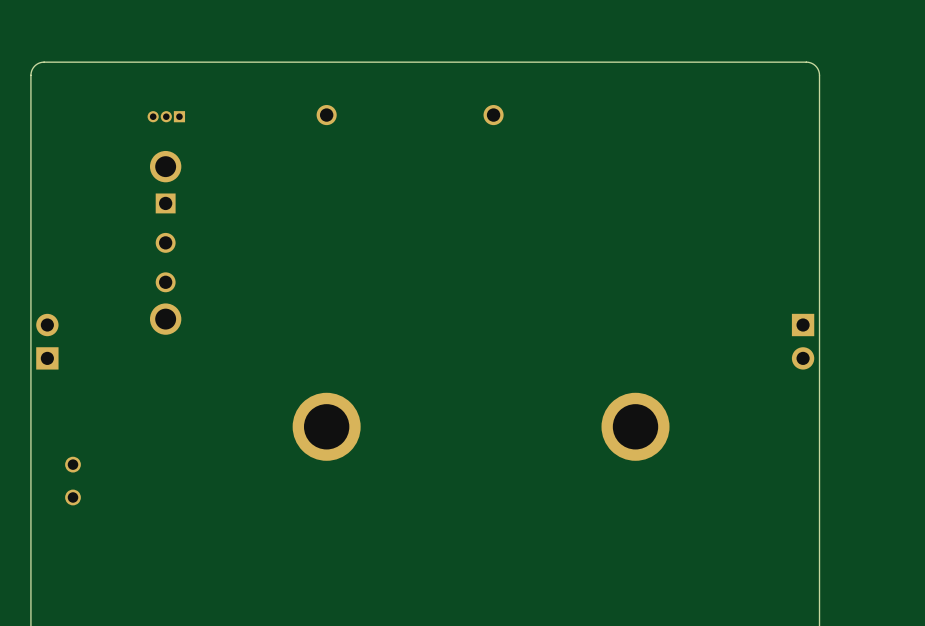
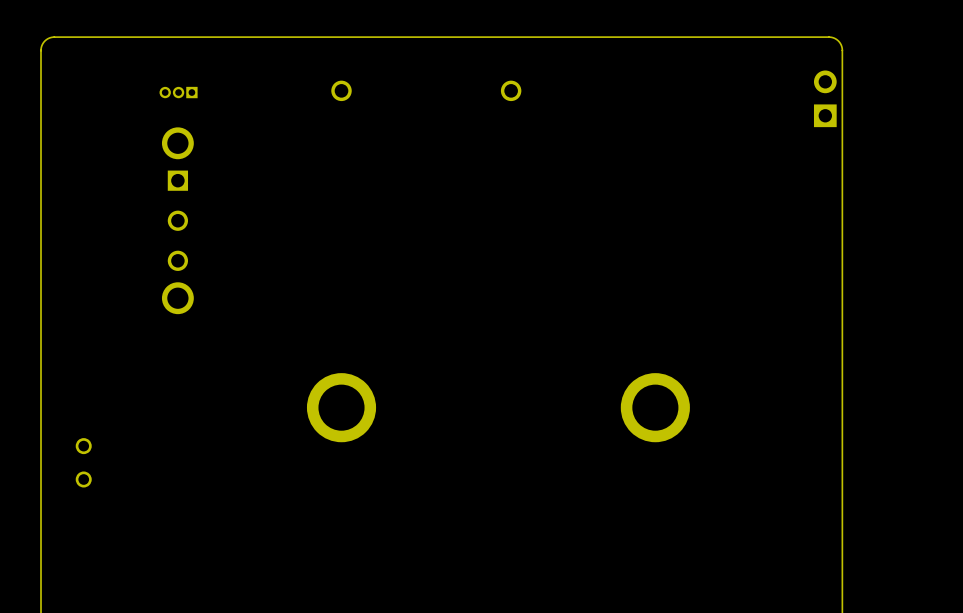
part: (47, 341) -> none
part rotation: 0° (803, 341) -> 180° (825, 98)
part position: (803, 341) -> (825, 98)

